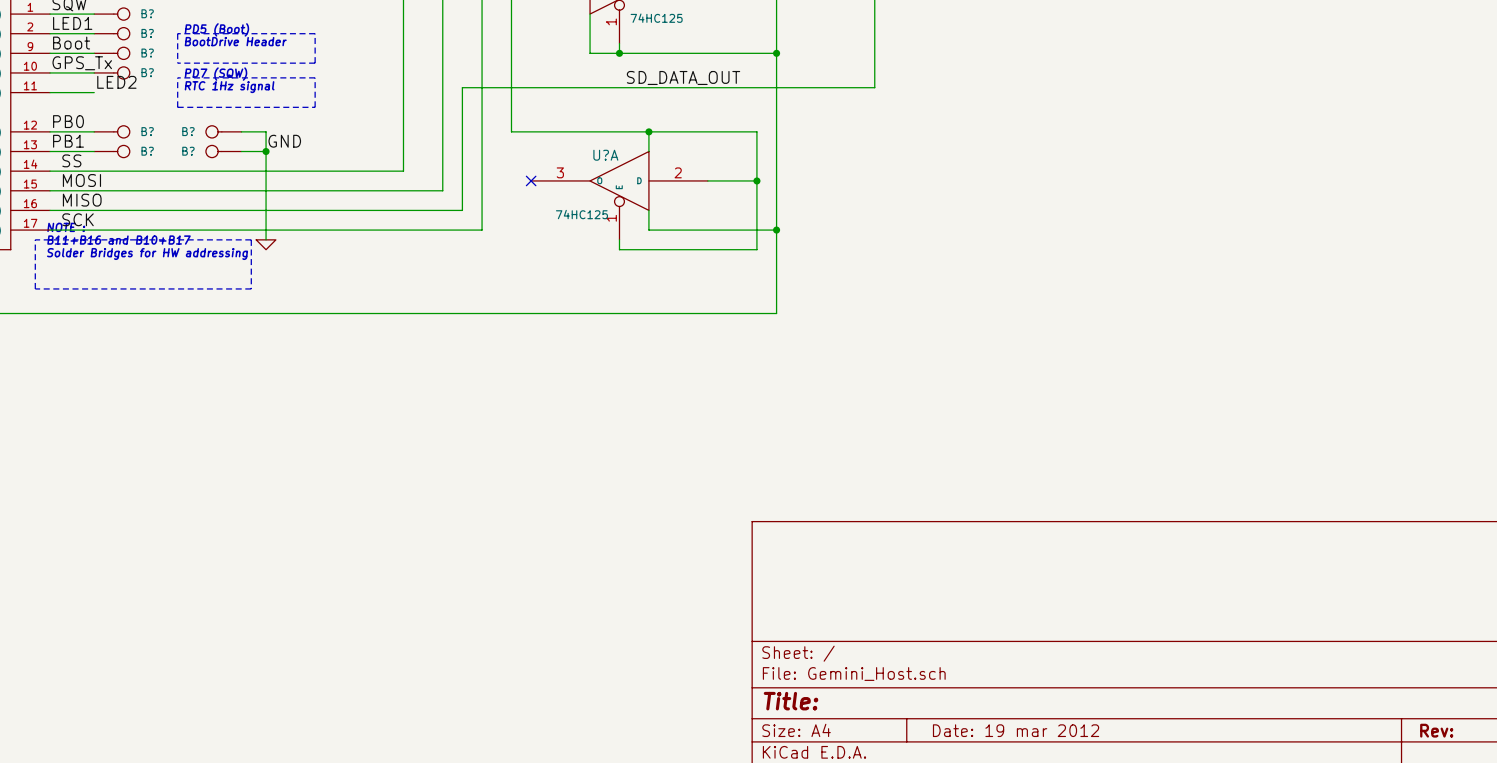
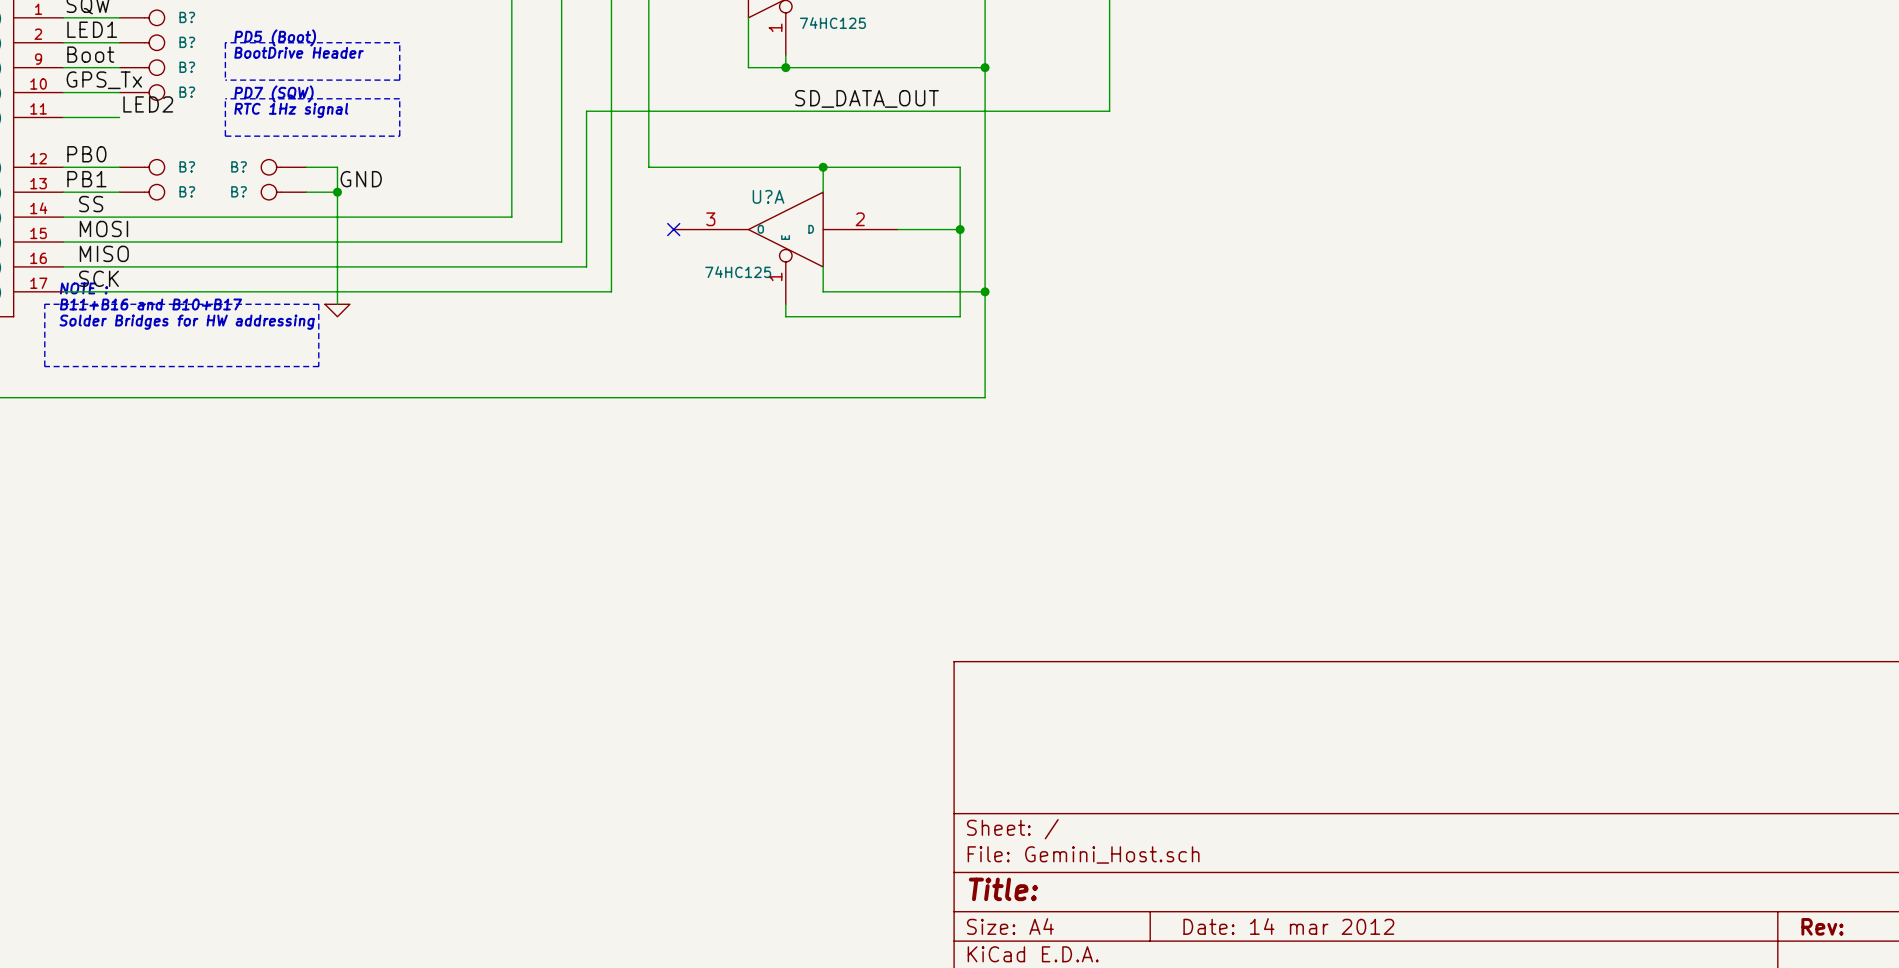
title block: Date: 19 mar 2012 (1016, 730) -> Date: 14 mar 2012 (1288, 926)

